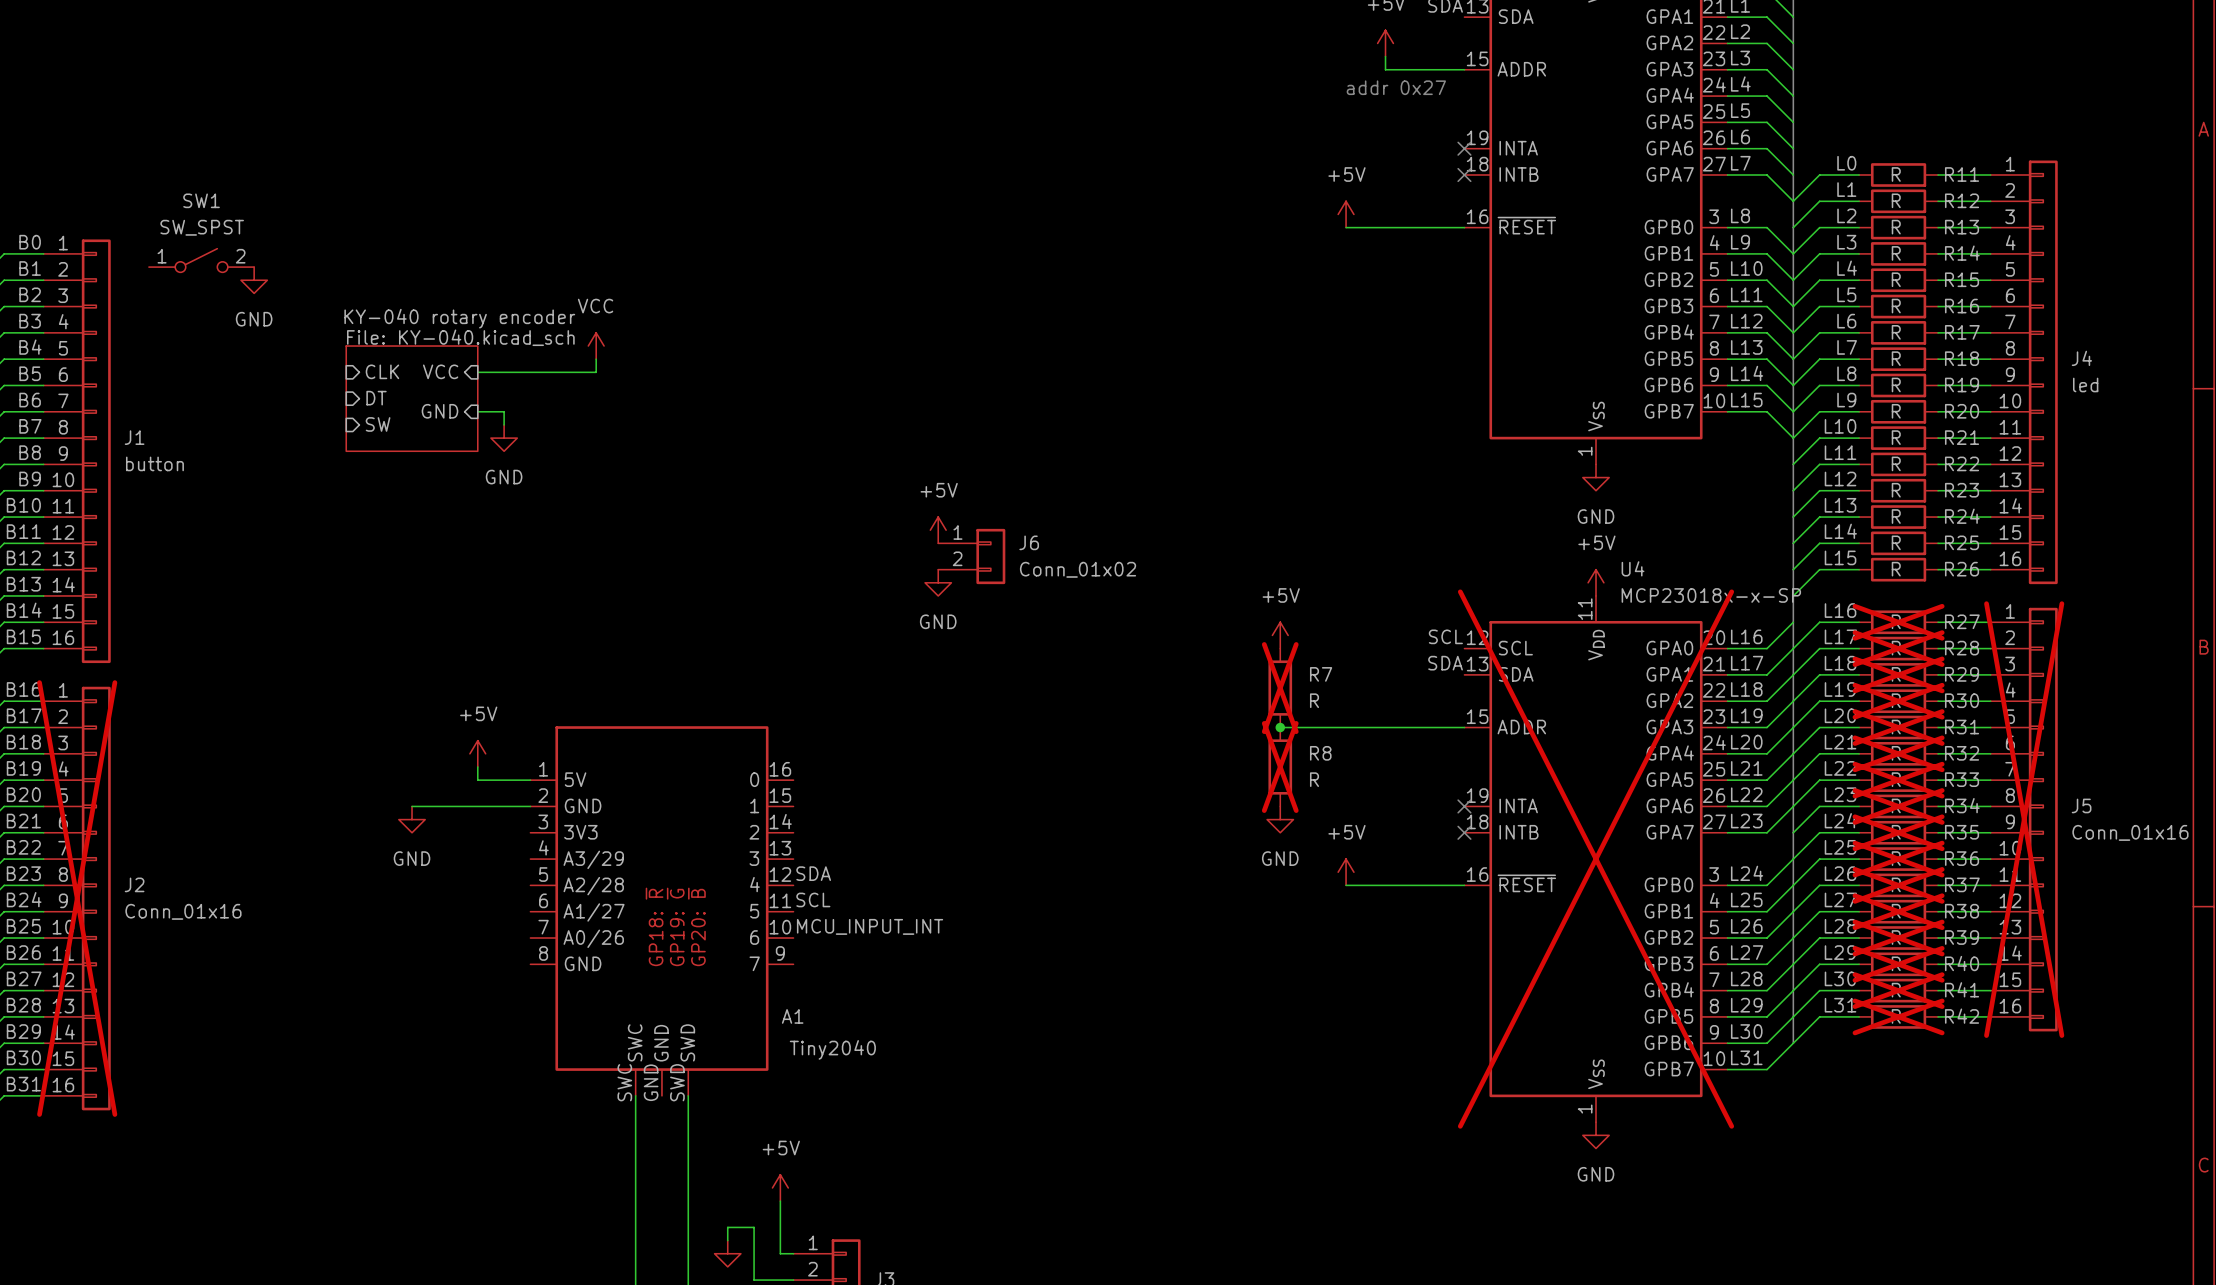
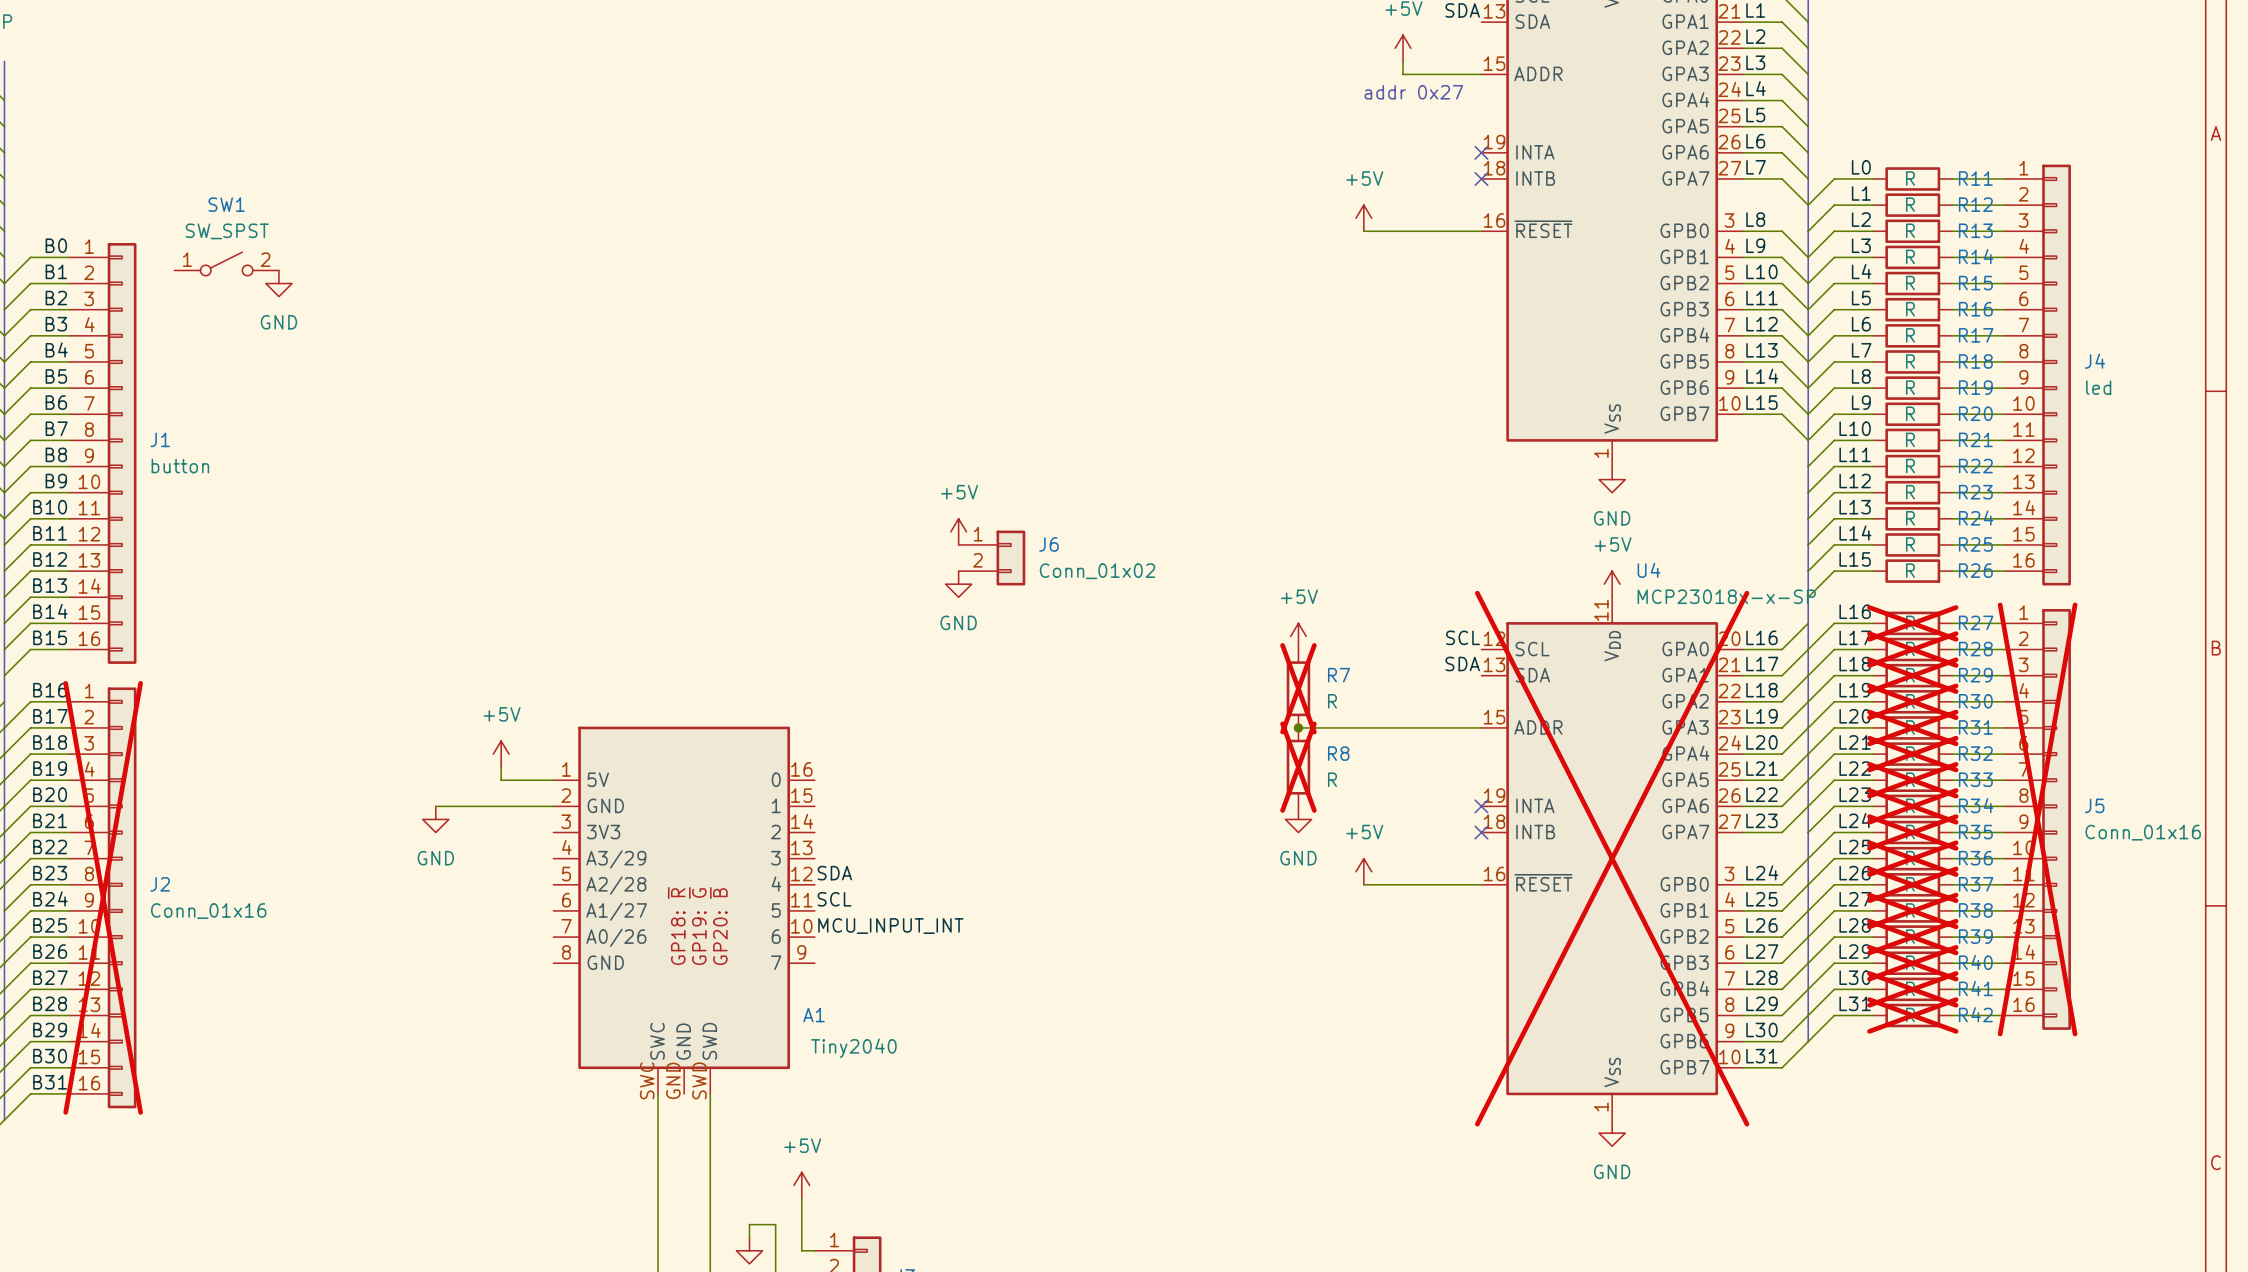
power symbol: VCC (596, 346) -> none
wire: (596, 359) (596, 372) (477, 372) -> none
sheet pin: CLK (382, 371) -> none
sheet pin: VCC (440, 371) -> none
sheet pin: DT (376, 398) -> none
sheet KY-040 rotary encoder: File: KY-040.kicad_sch (412, 398) -> none
sheet pin: GND (440, 411) -> none
wire: (477, 411) (504, 411) (504, 424) -> none
sheet pin: SW (378, 424) -> none
power symbol: GND (504, 438) -> none

